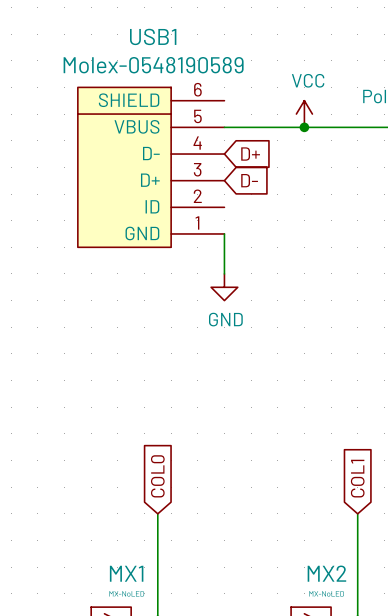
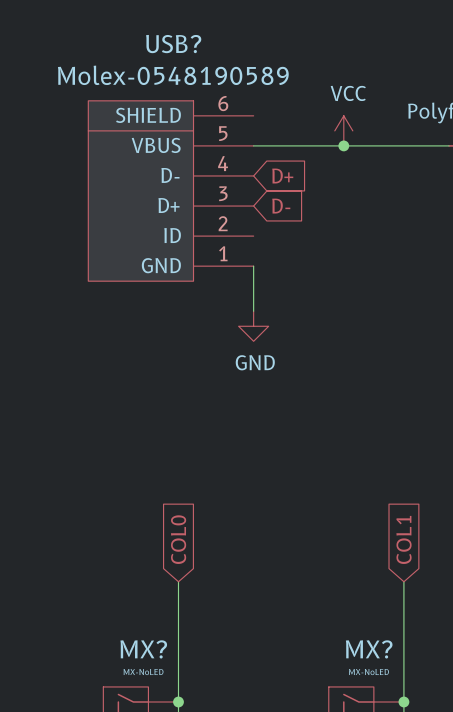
USB1 name: USB1 (153, 36) -> USB? (173, 44)
MX1 name: MX1 (126, 573) -> MX? (143, 649)
MX2 name: MX2 (326, 573) -> MX? (369, 649)

